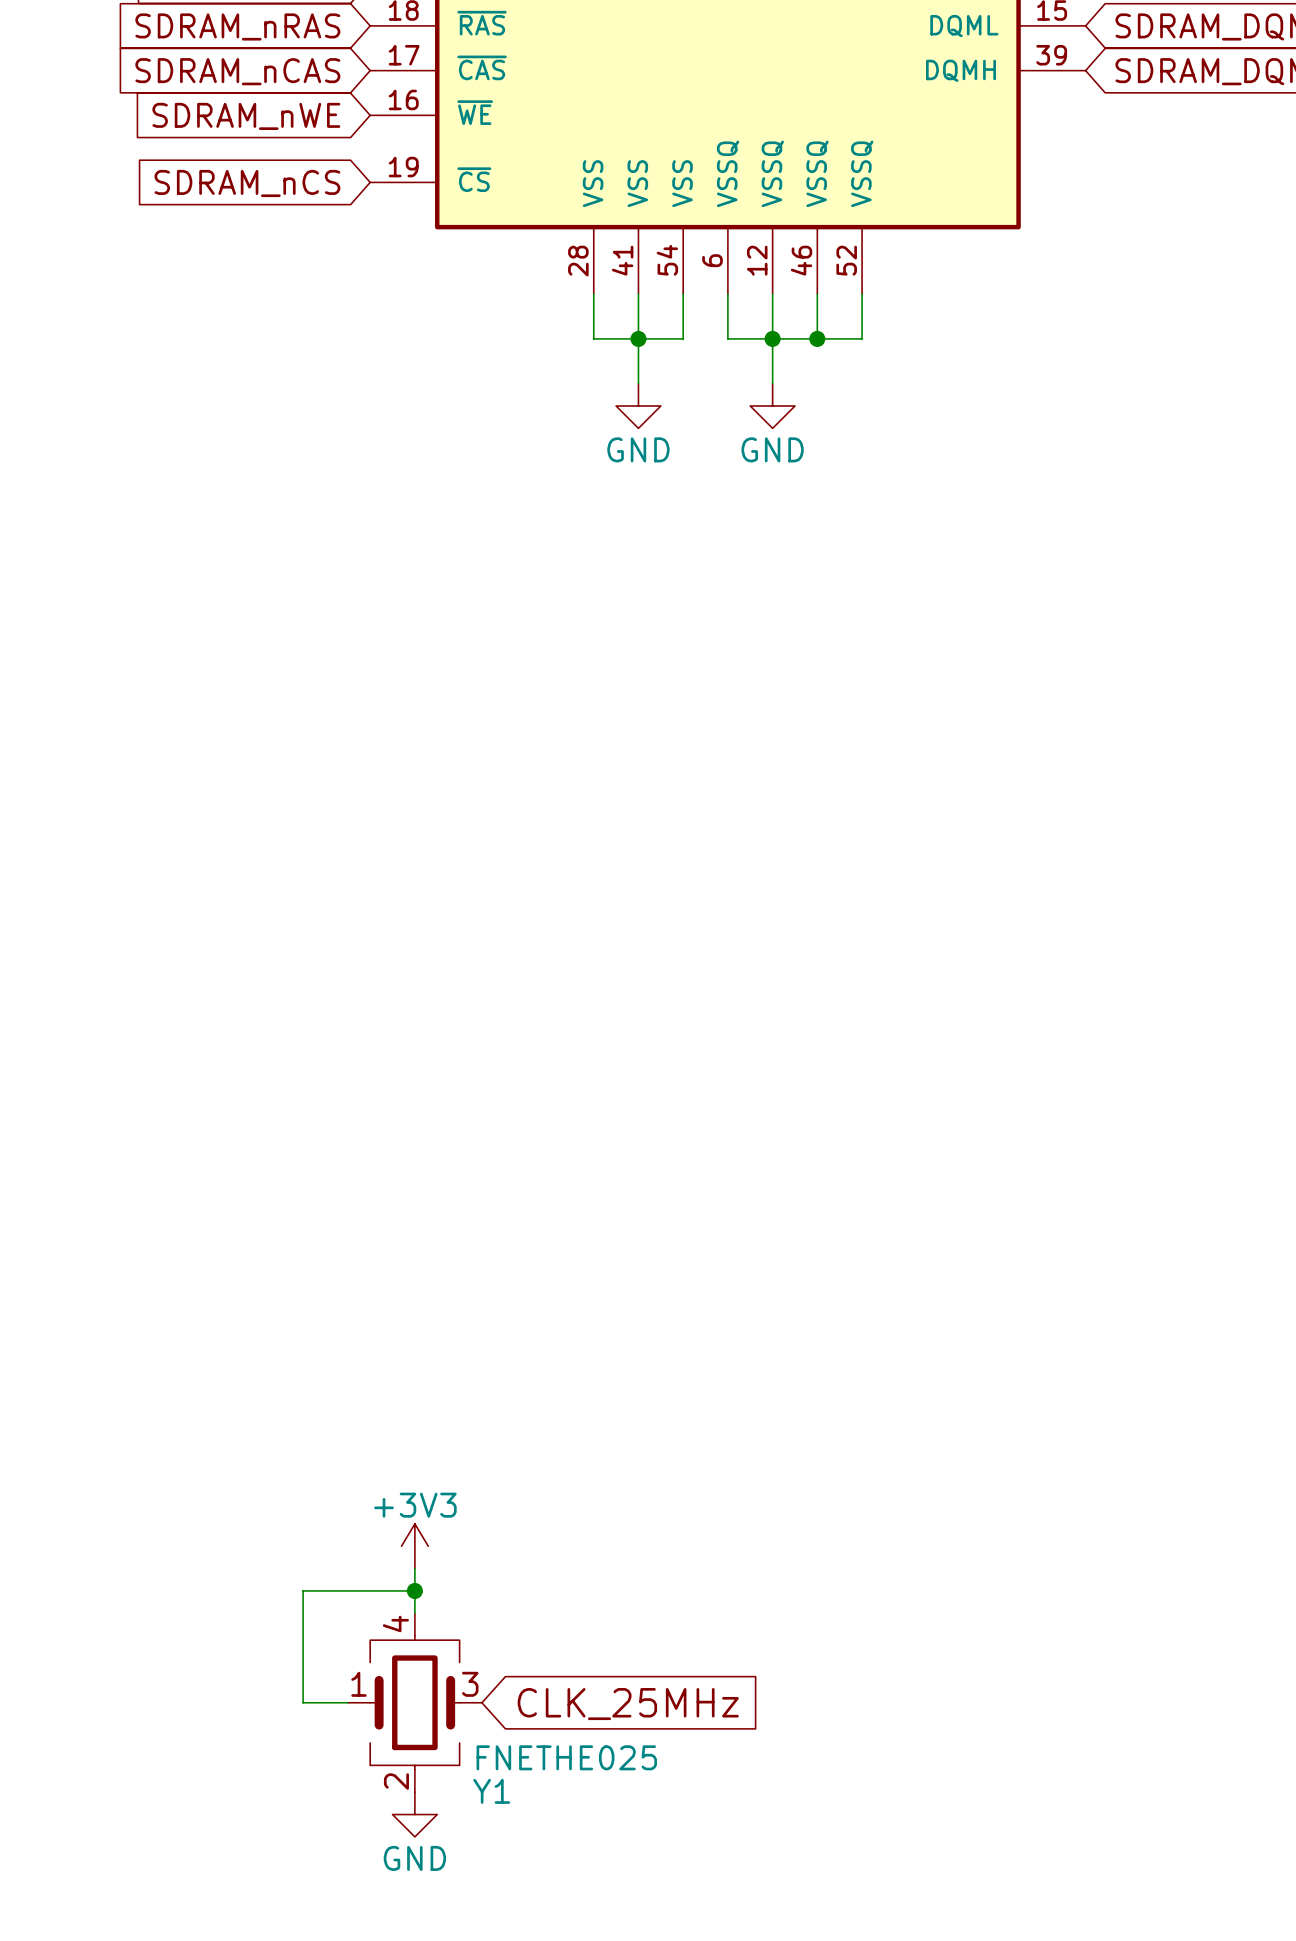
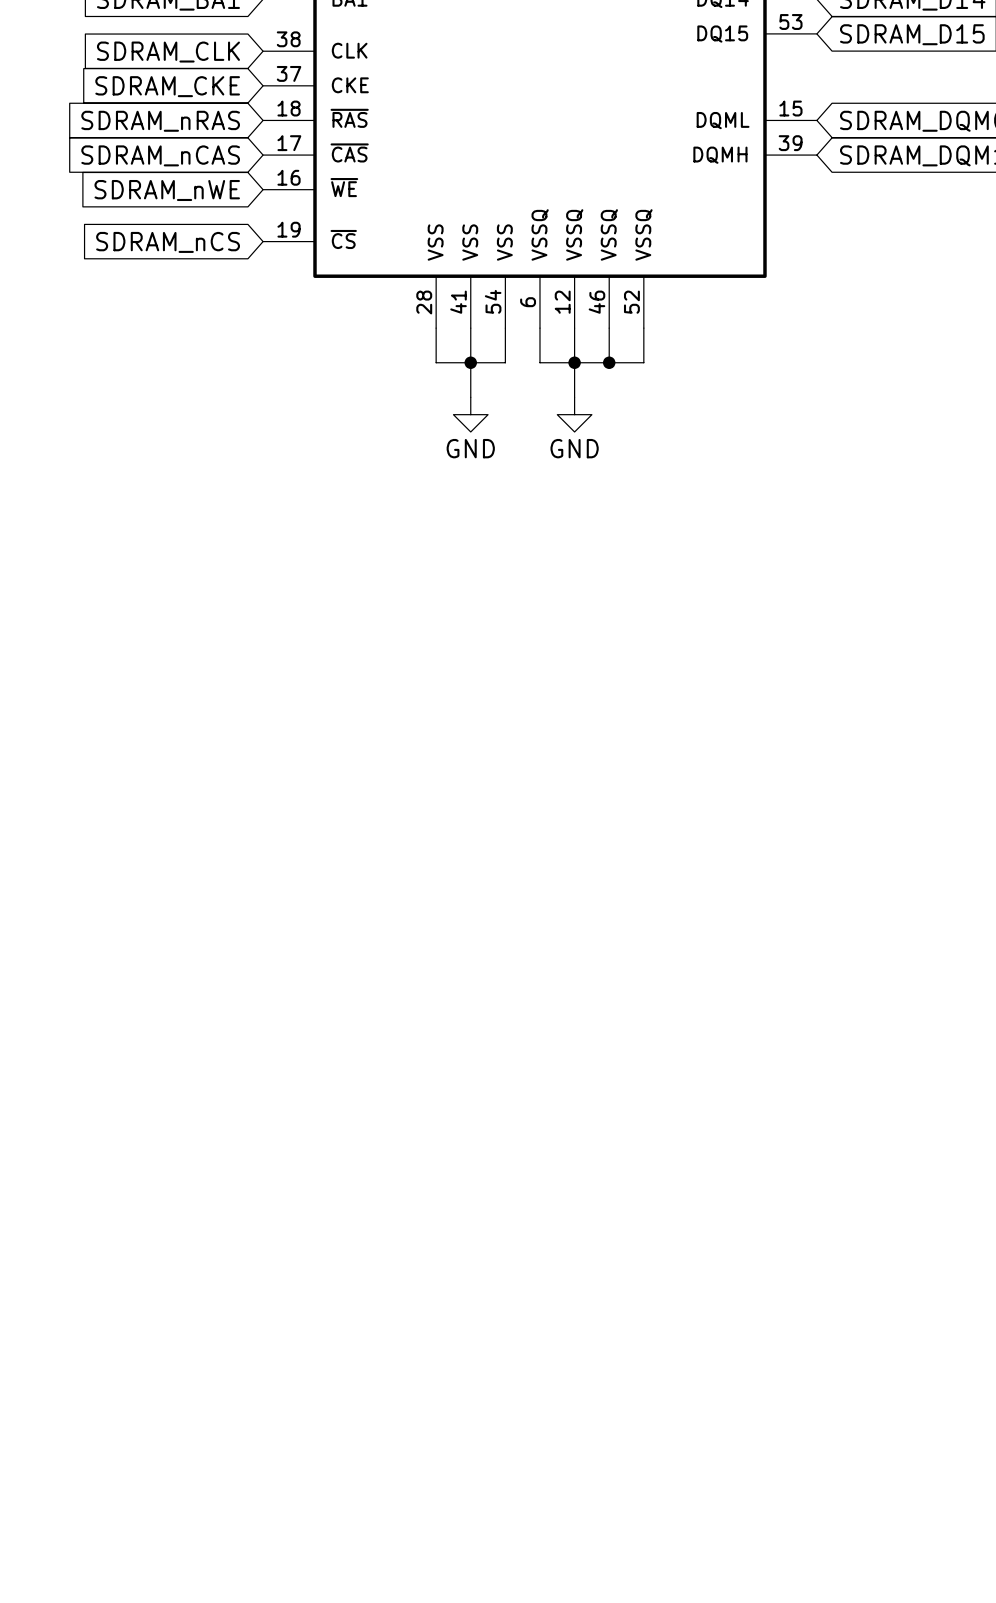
power symbol: +3V3 (414, 1546) -> none
wire: (414, 1568) (414, 1613) -> none
wire: (414, 1590) (303, 1590) (303, 1702) (347, 1702) -> none
junction: (414, 1590) -> none
Y1: FNETHE025 (414, 1702) -> none
global label: CLK_25MHz (628, 1704) -> none
power symbol: GND (414, 1814) -> none

